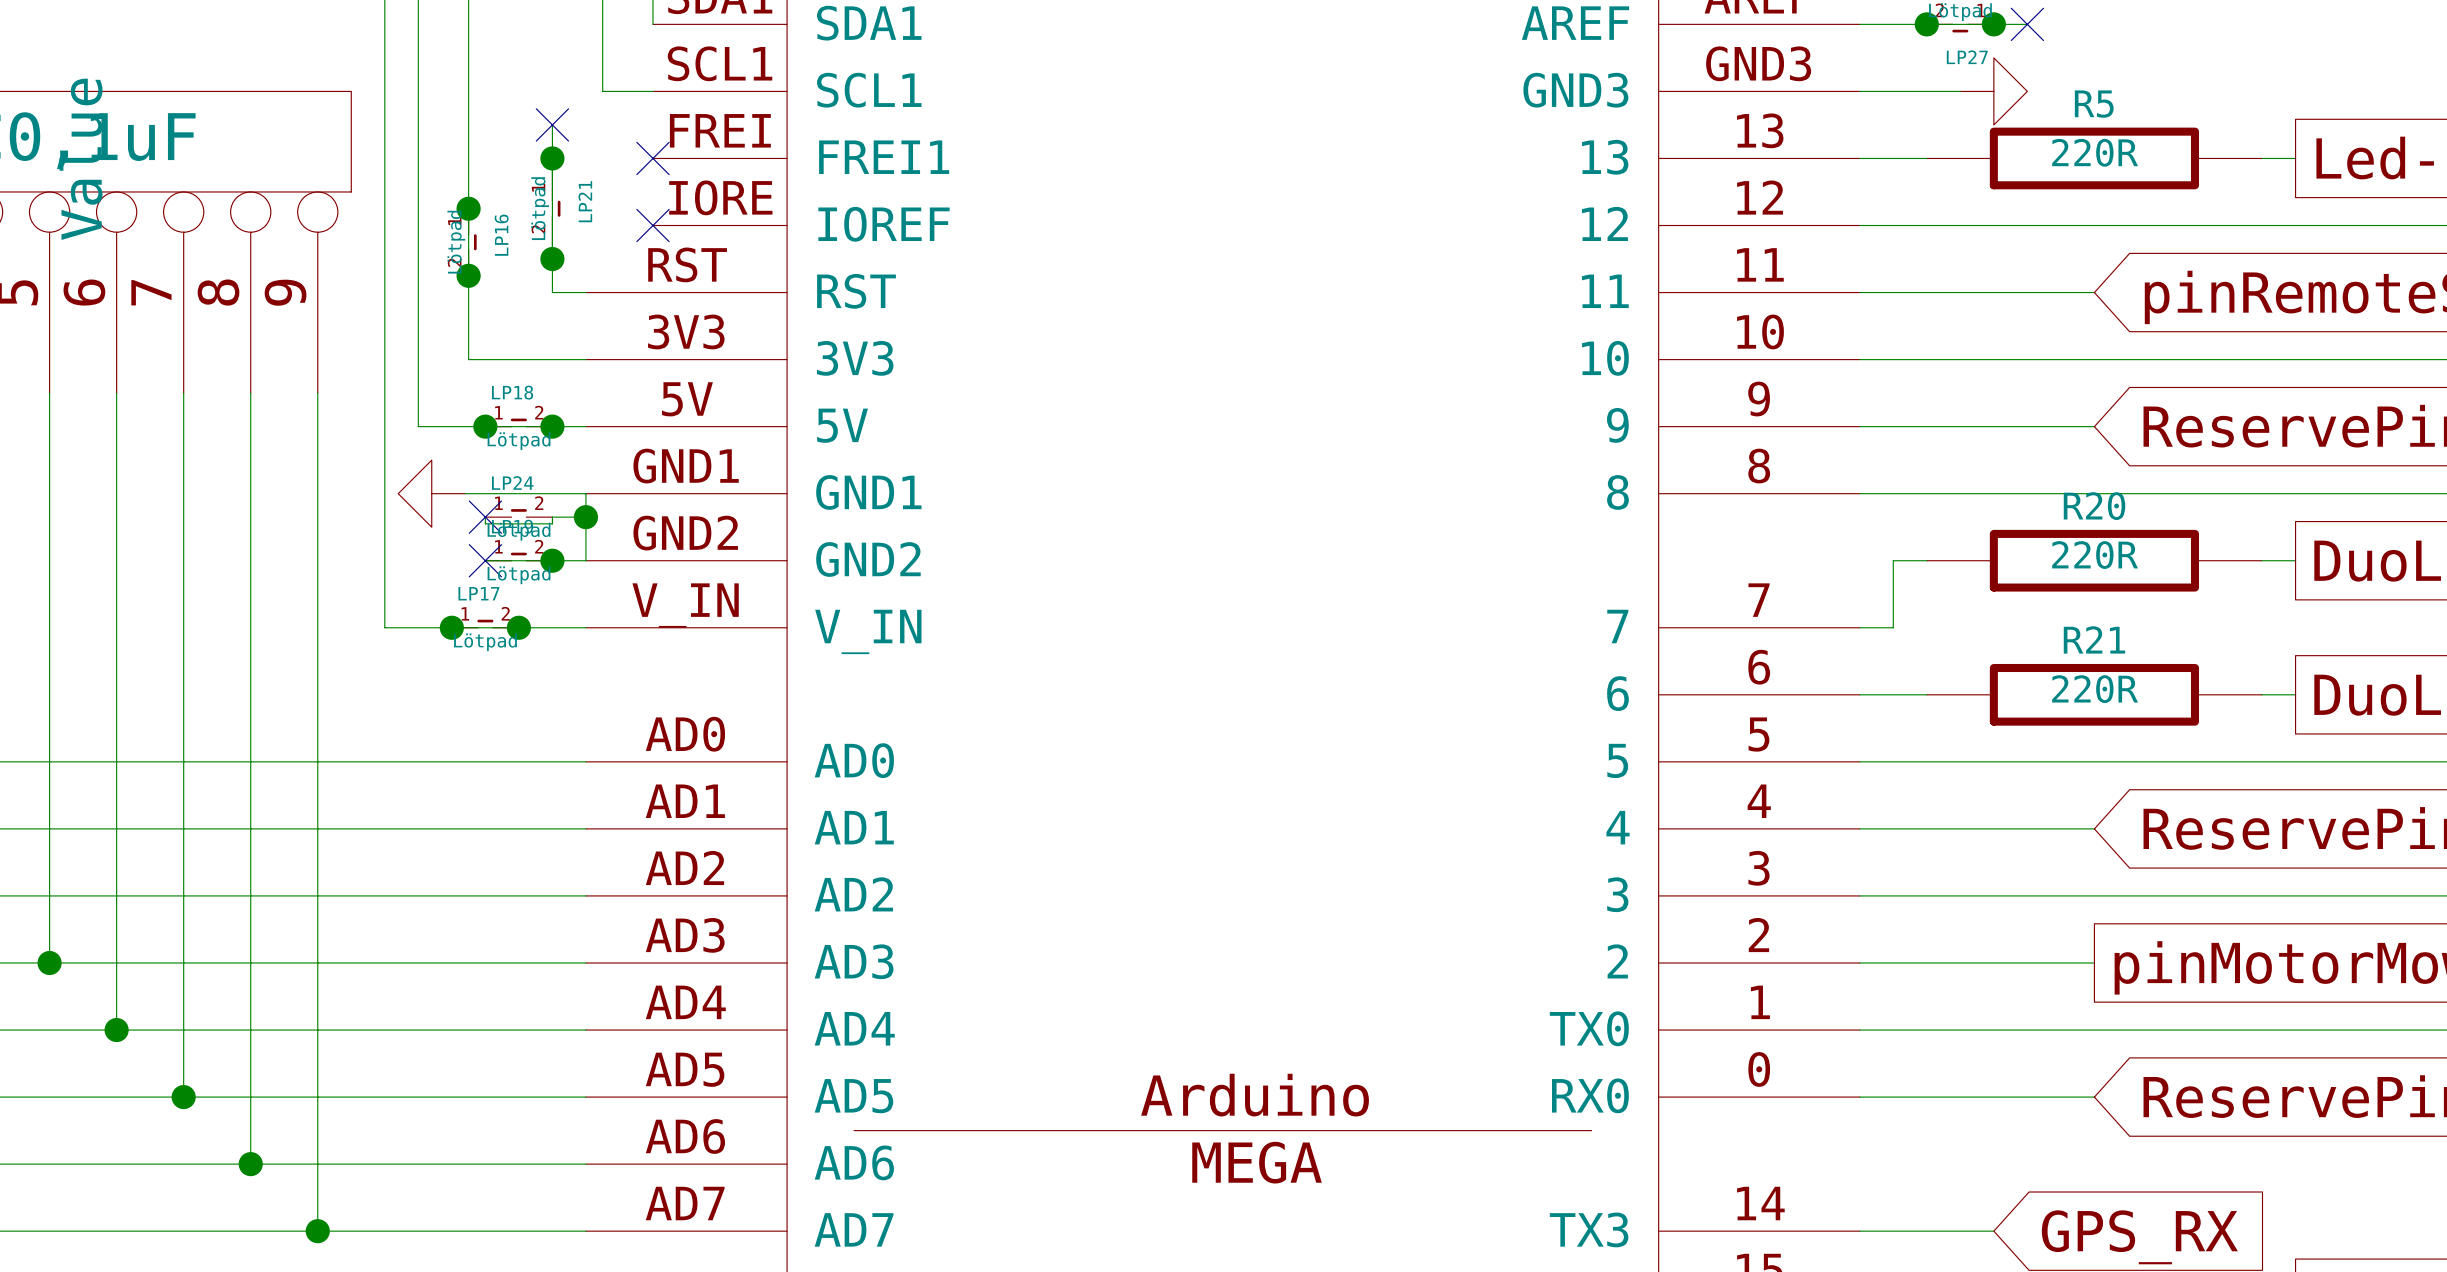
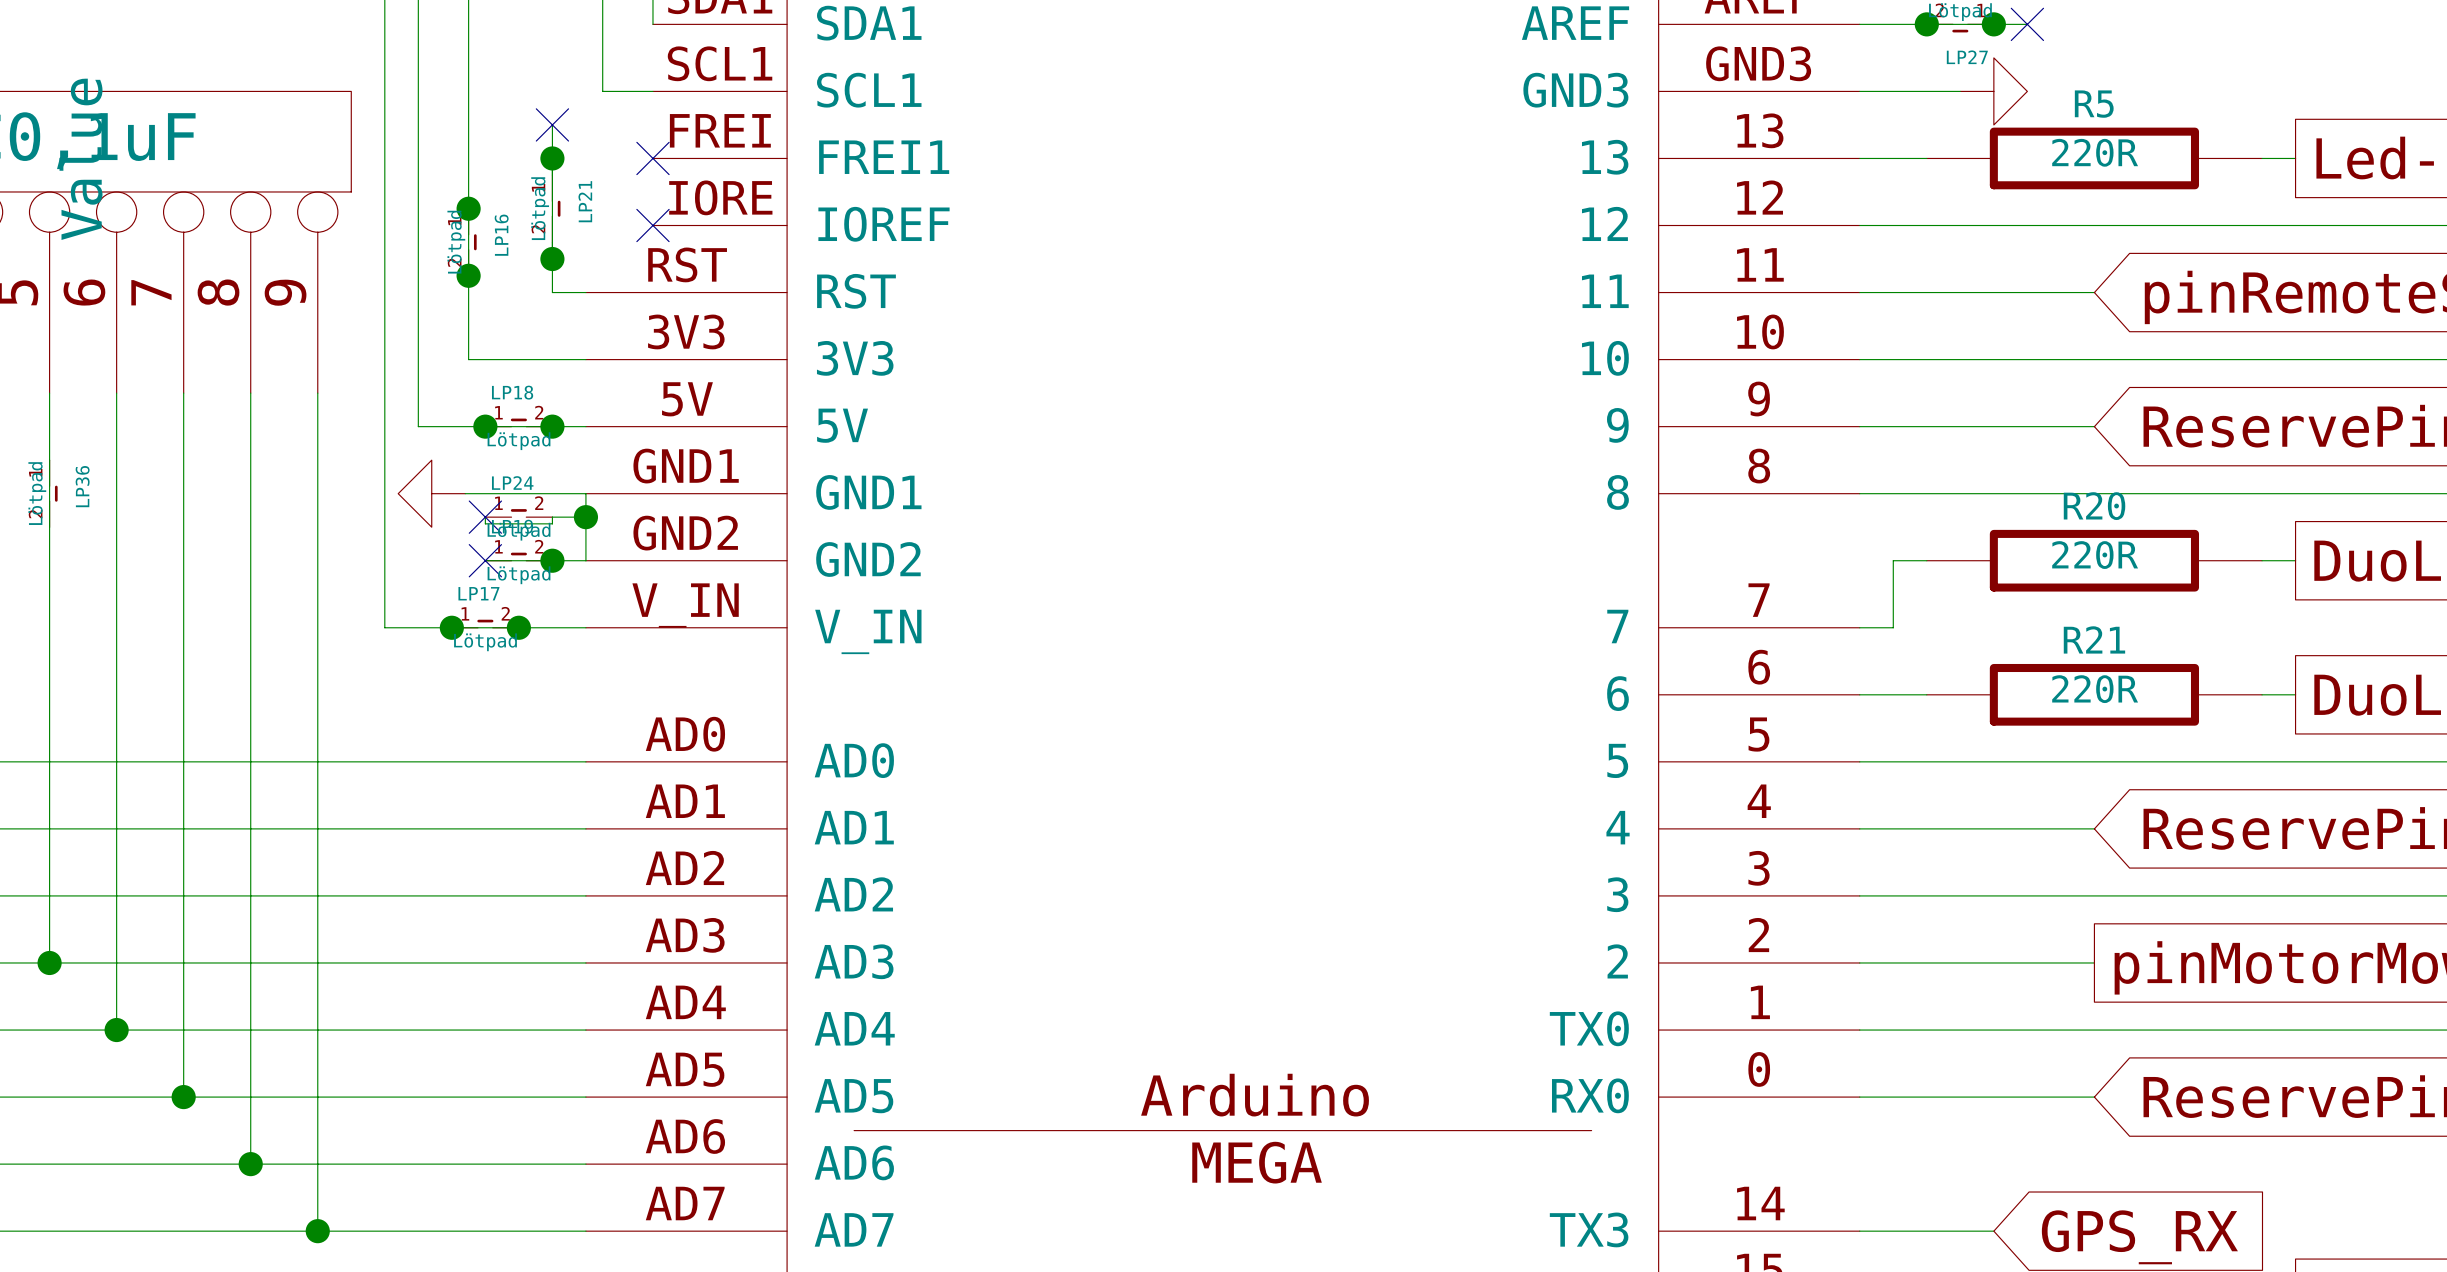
LP36: none -> Lötpad (53, 493)

